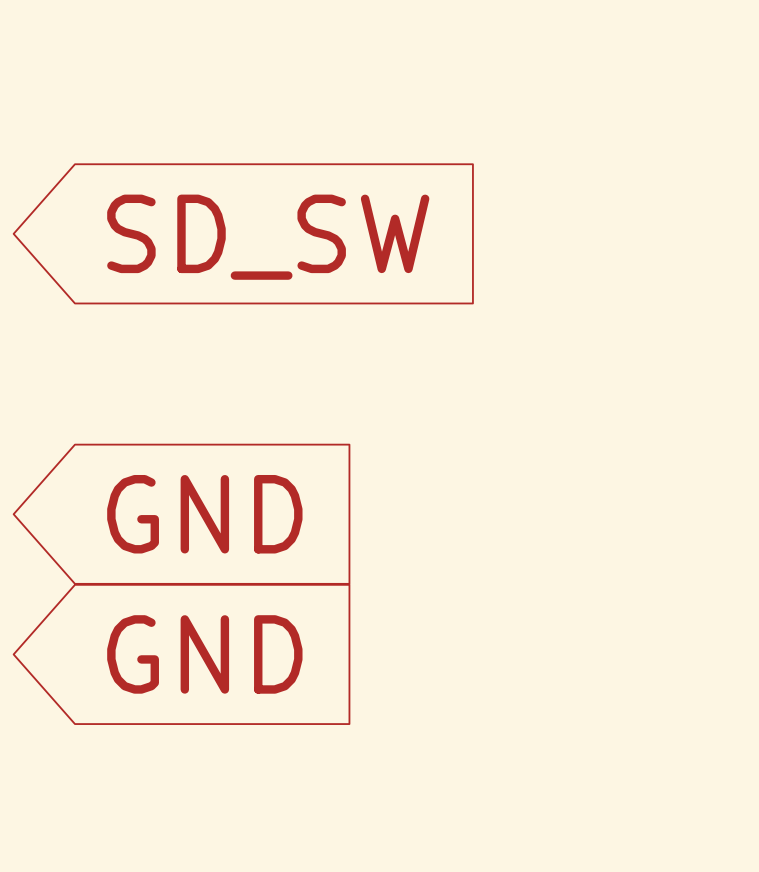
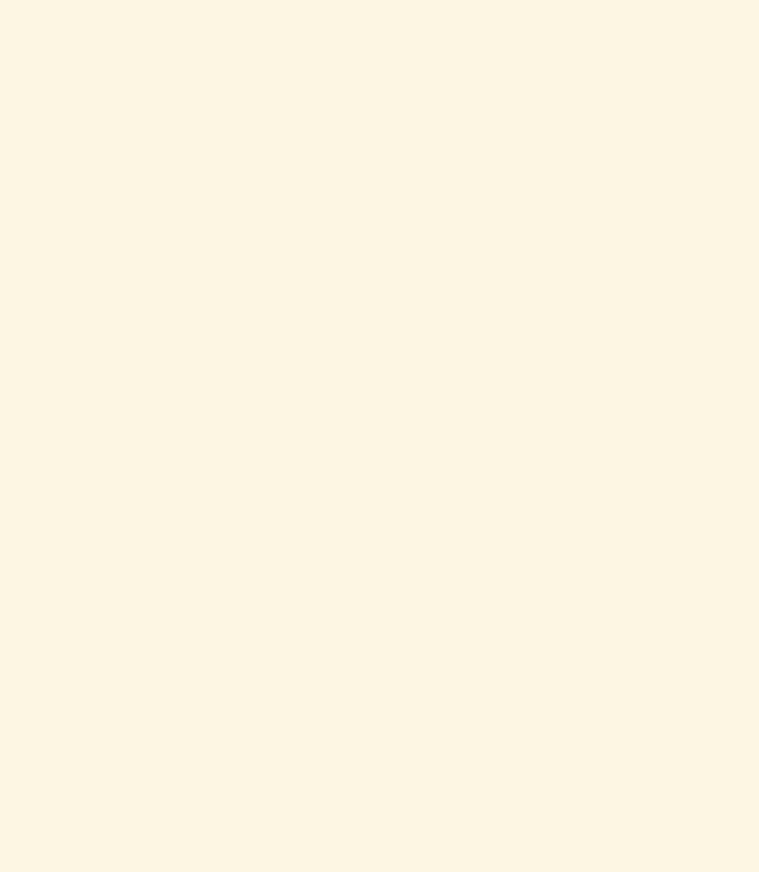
global label: SD_SW (268, 237) -> none
global label: GND (204, 514) -> none
global label: GND (204, 654) -> none

